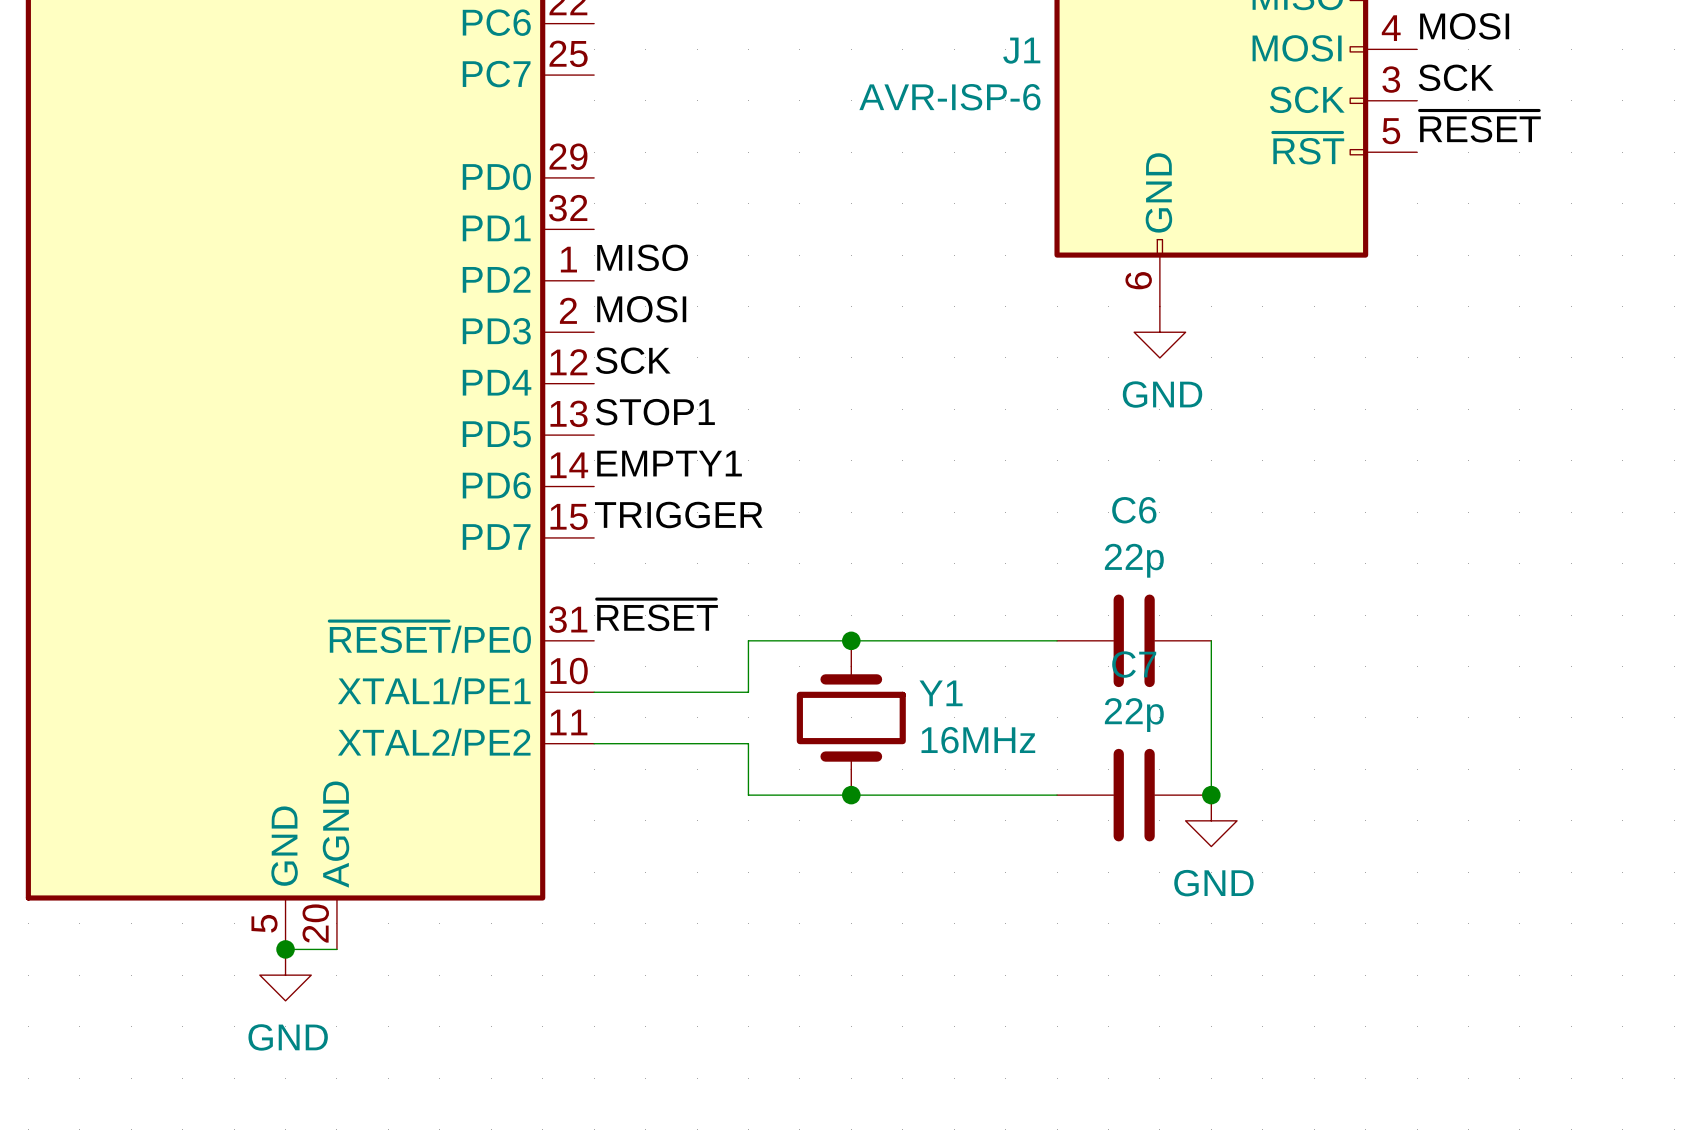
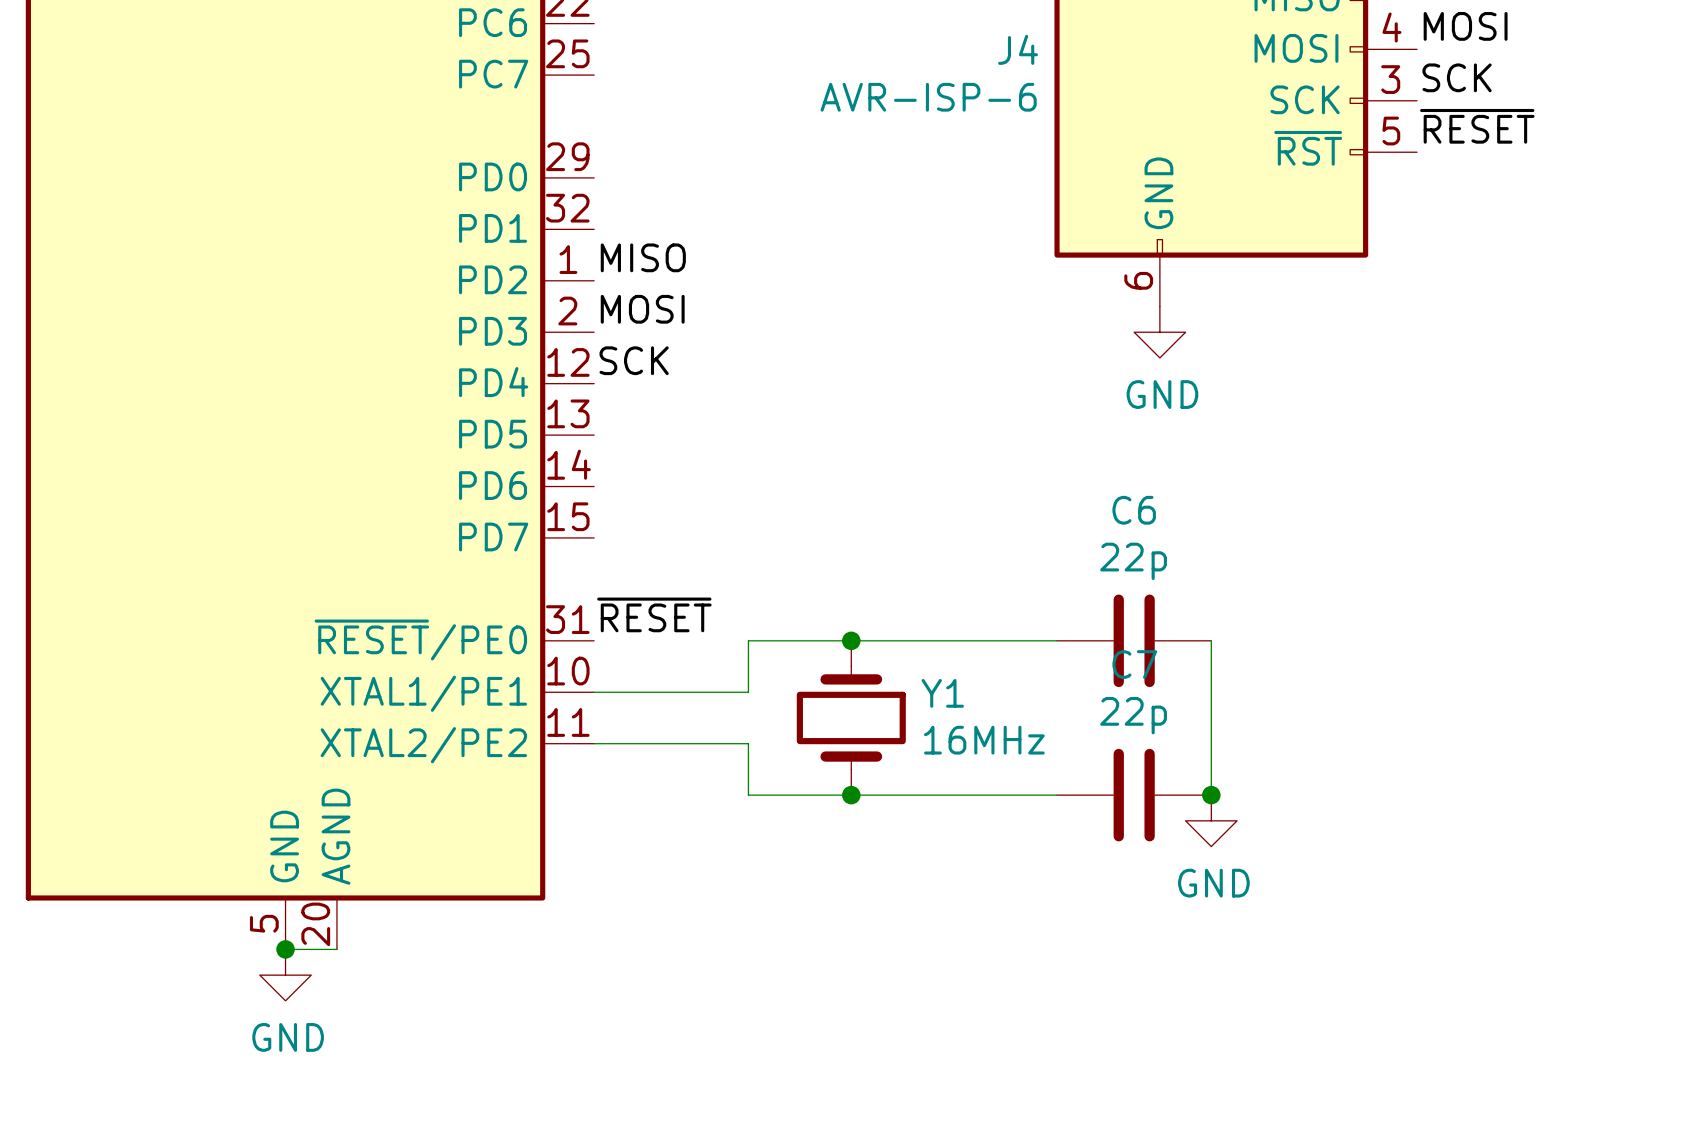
J1 name: J1 (1021, 50) -> J4 (1018, 49)
label: STOP1 (655, 412) -> none
label: EMPTY1 (669, 463) -> none
label: TRIGGER (678, 515) -> none

